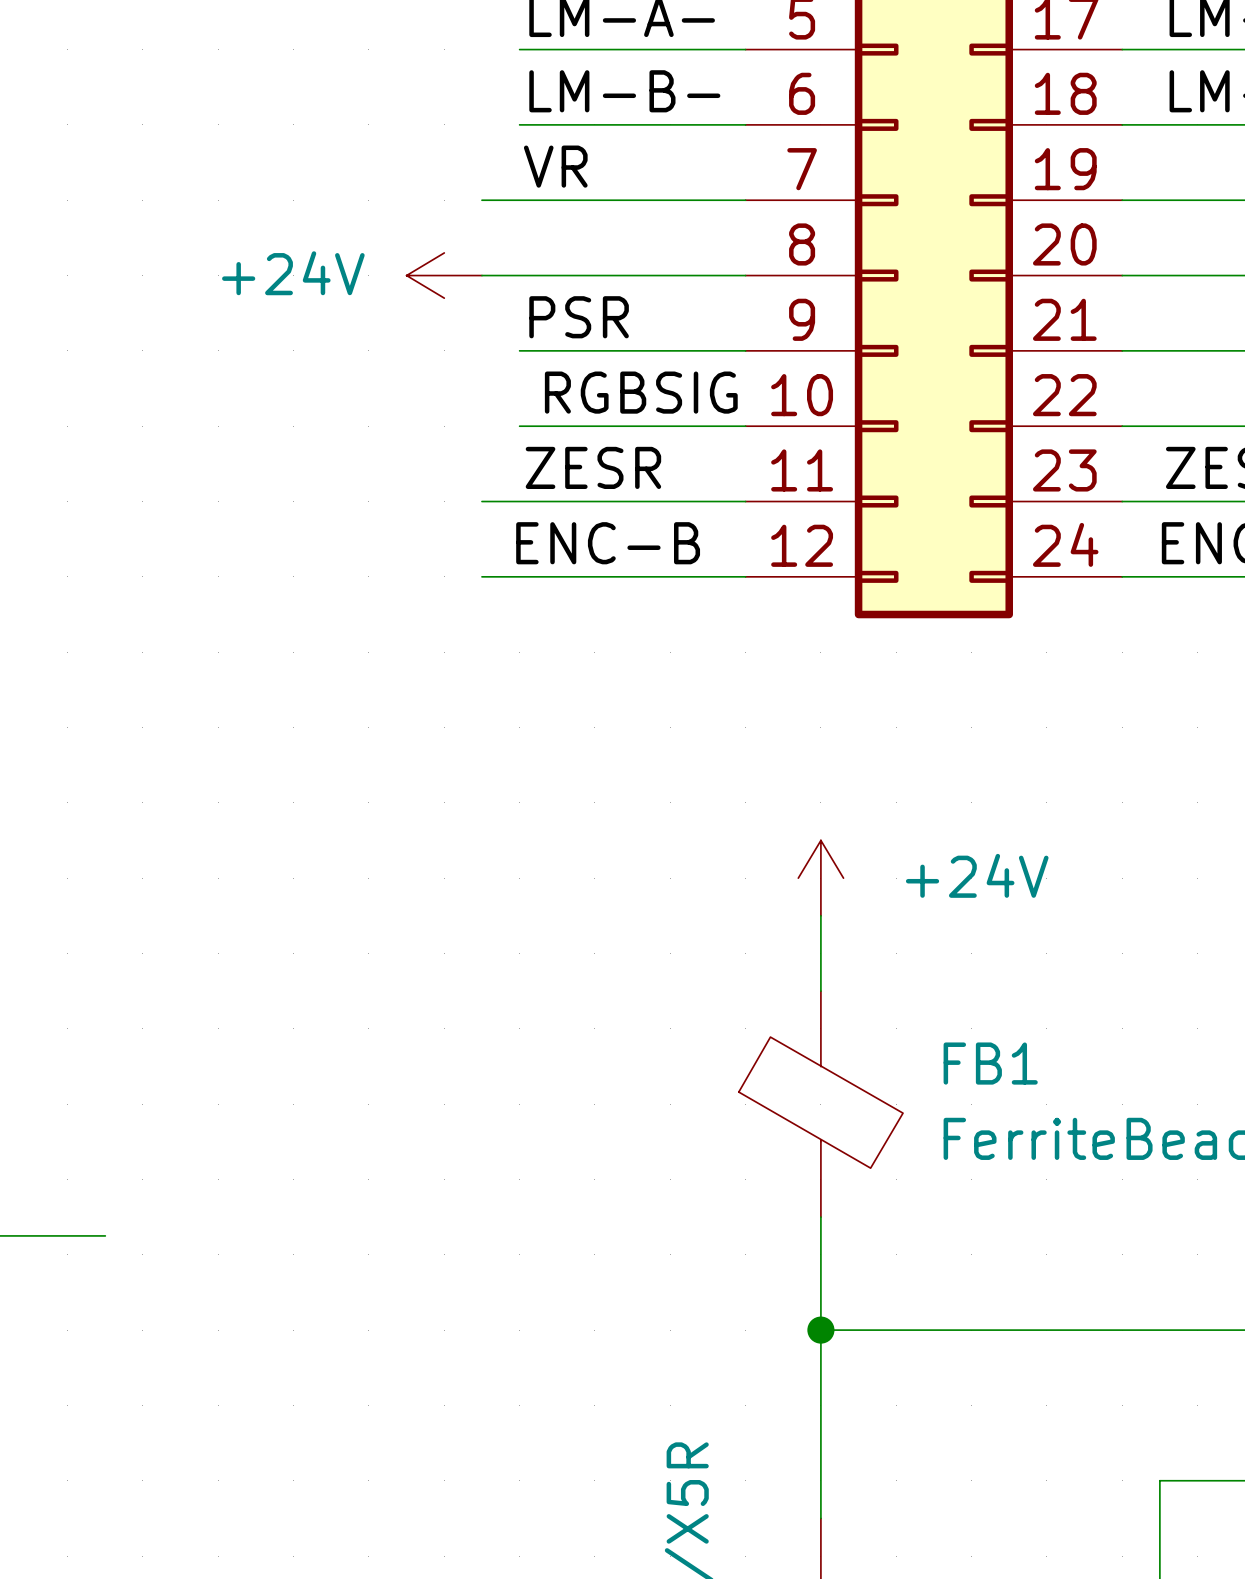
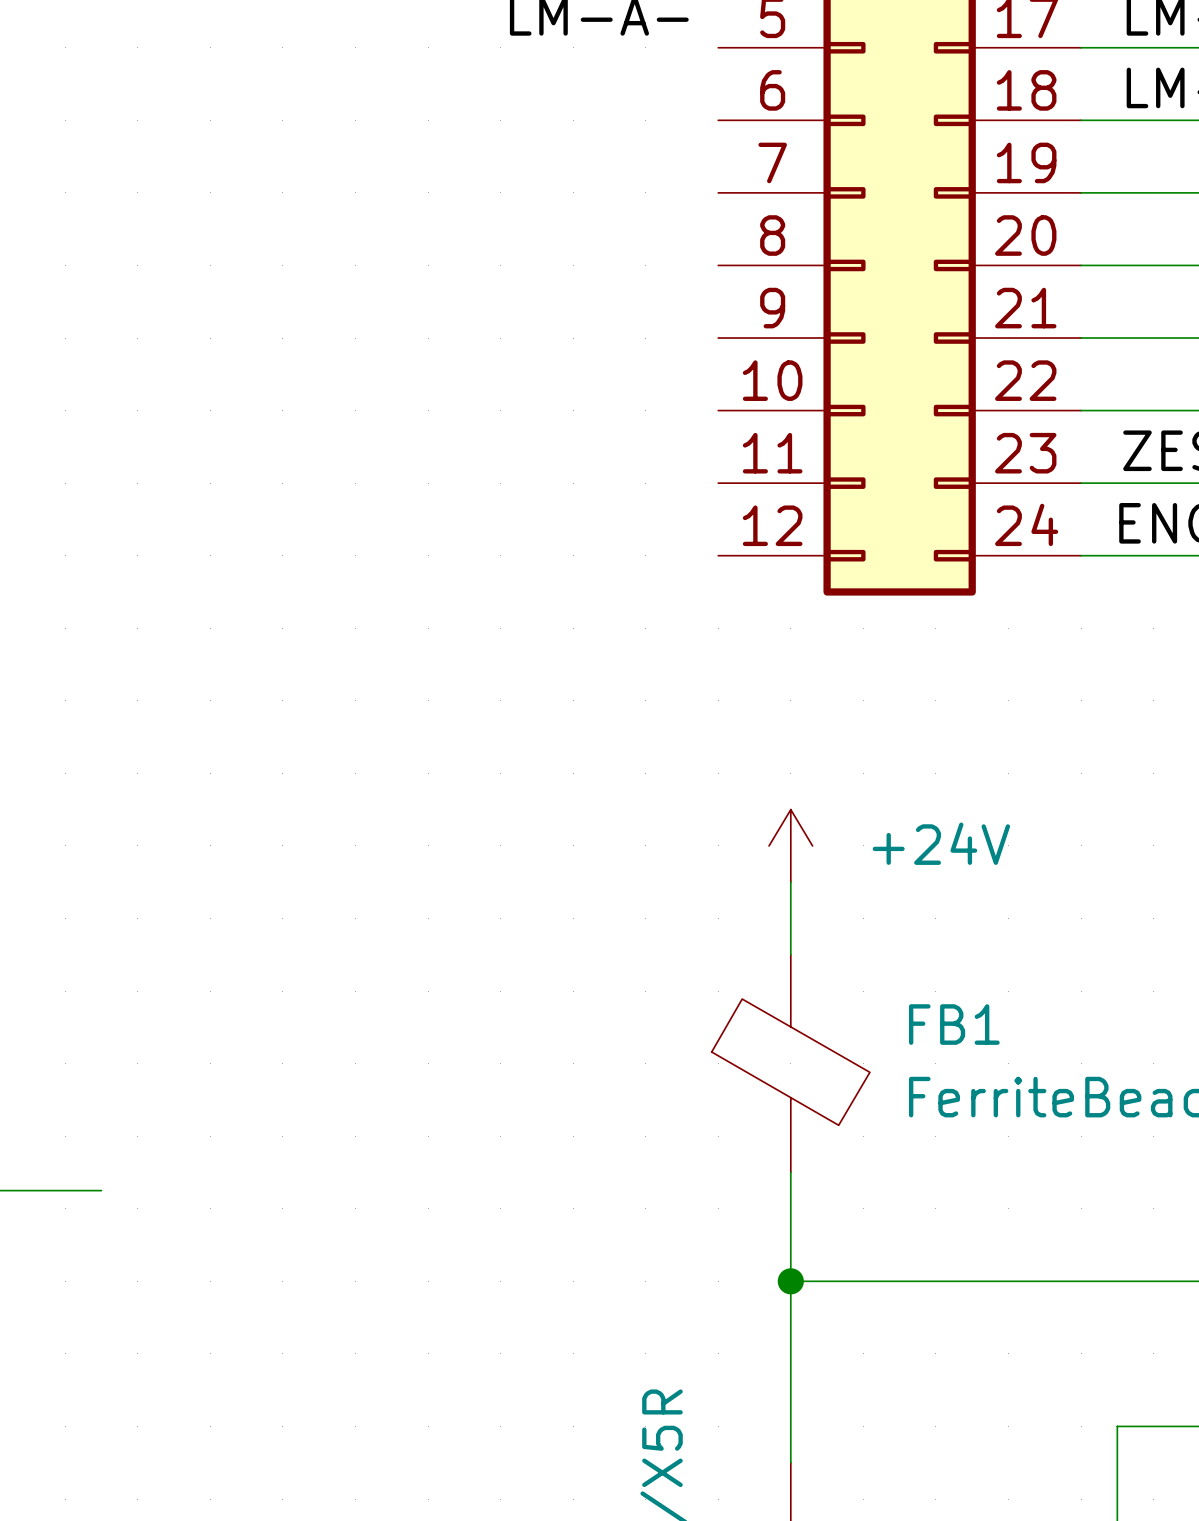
wire: (519, 49) (745, 49) -> none
label: LM-B- (624, 91) -> none
wire: (519, 124) (745, 124) -> none
label: VR (555, 166) -> none
wire: (481, 200) (745, 200) -> none
power symbol: +24V (444, 275) -> none
wire: (481, 275) (745, 275) -> none
label: PSR (579, 317) -> none
wire: (519, 350) (745, 350) -> none
label: RGBSIG (641, 392) -> none
wire: (519, 426) (745, 426) -> none
label: ZESR (593, 467) -> none
wire: (481, 501) (745, 501) -> none
label: ENC-B (608, 543) -> none
wire: (481, 576) (745, 576) -> none

